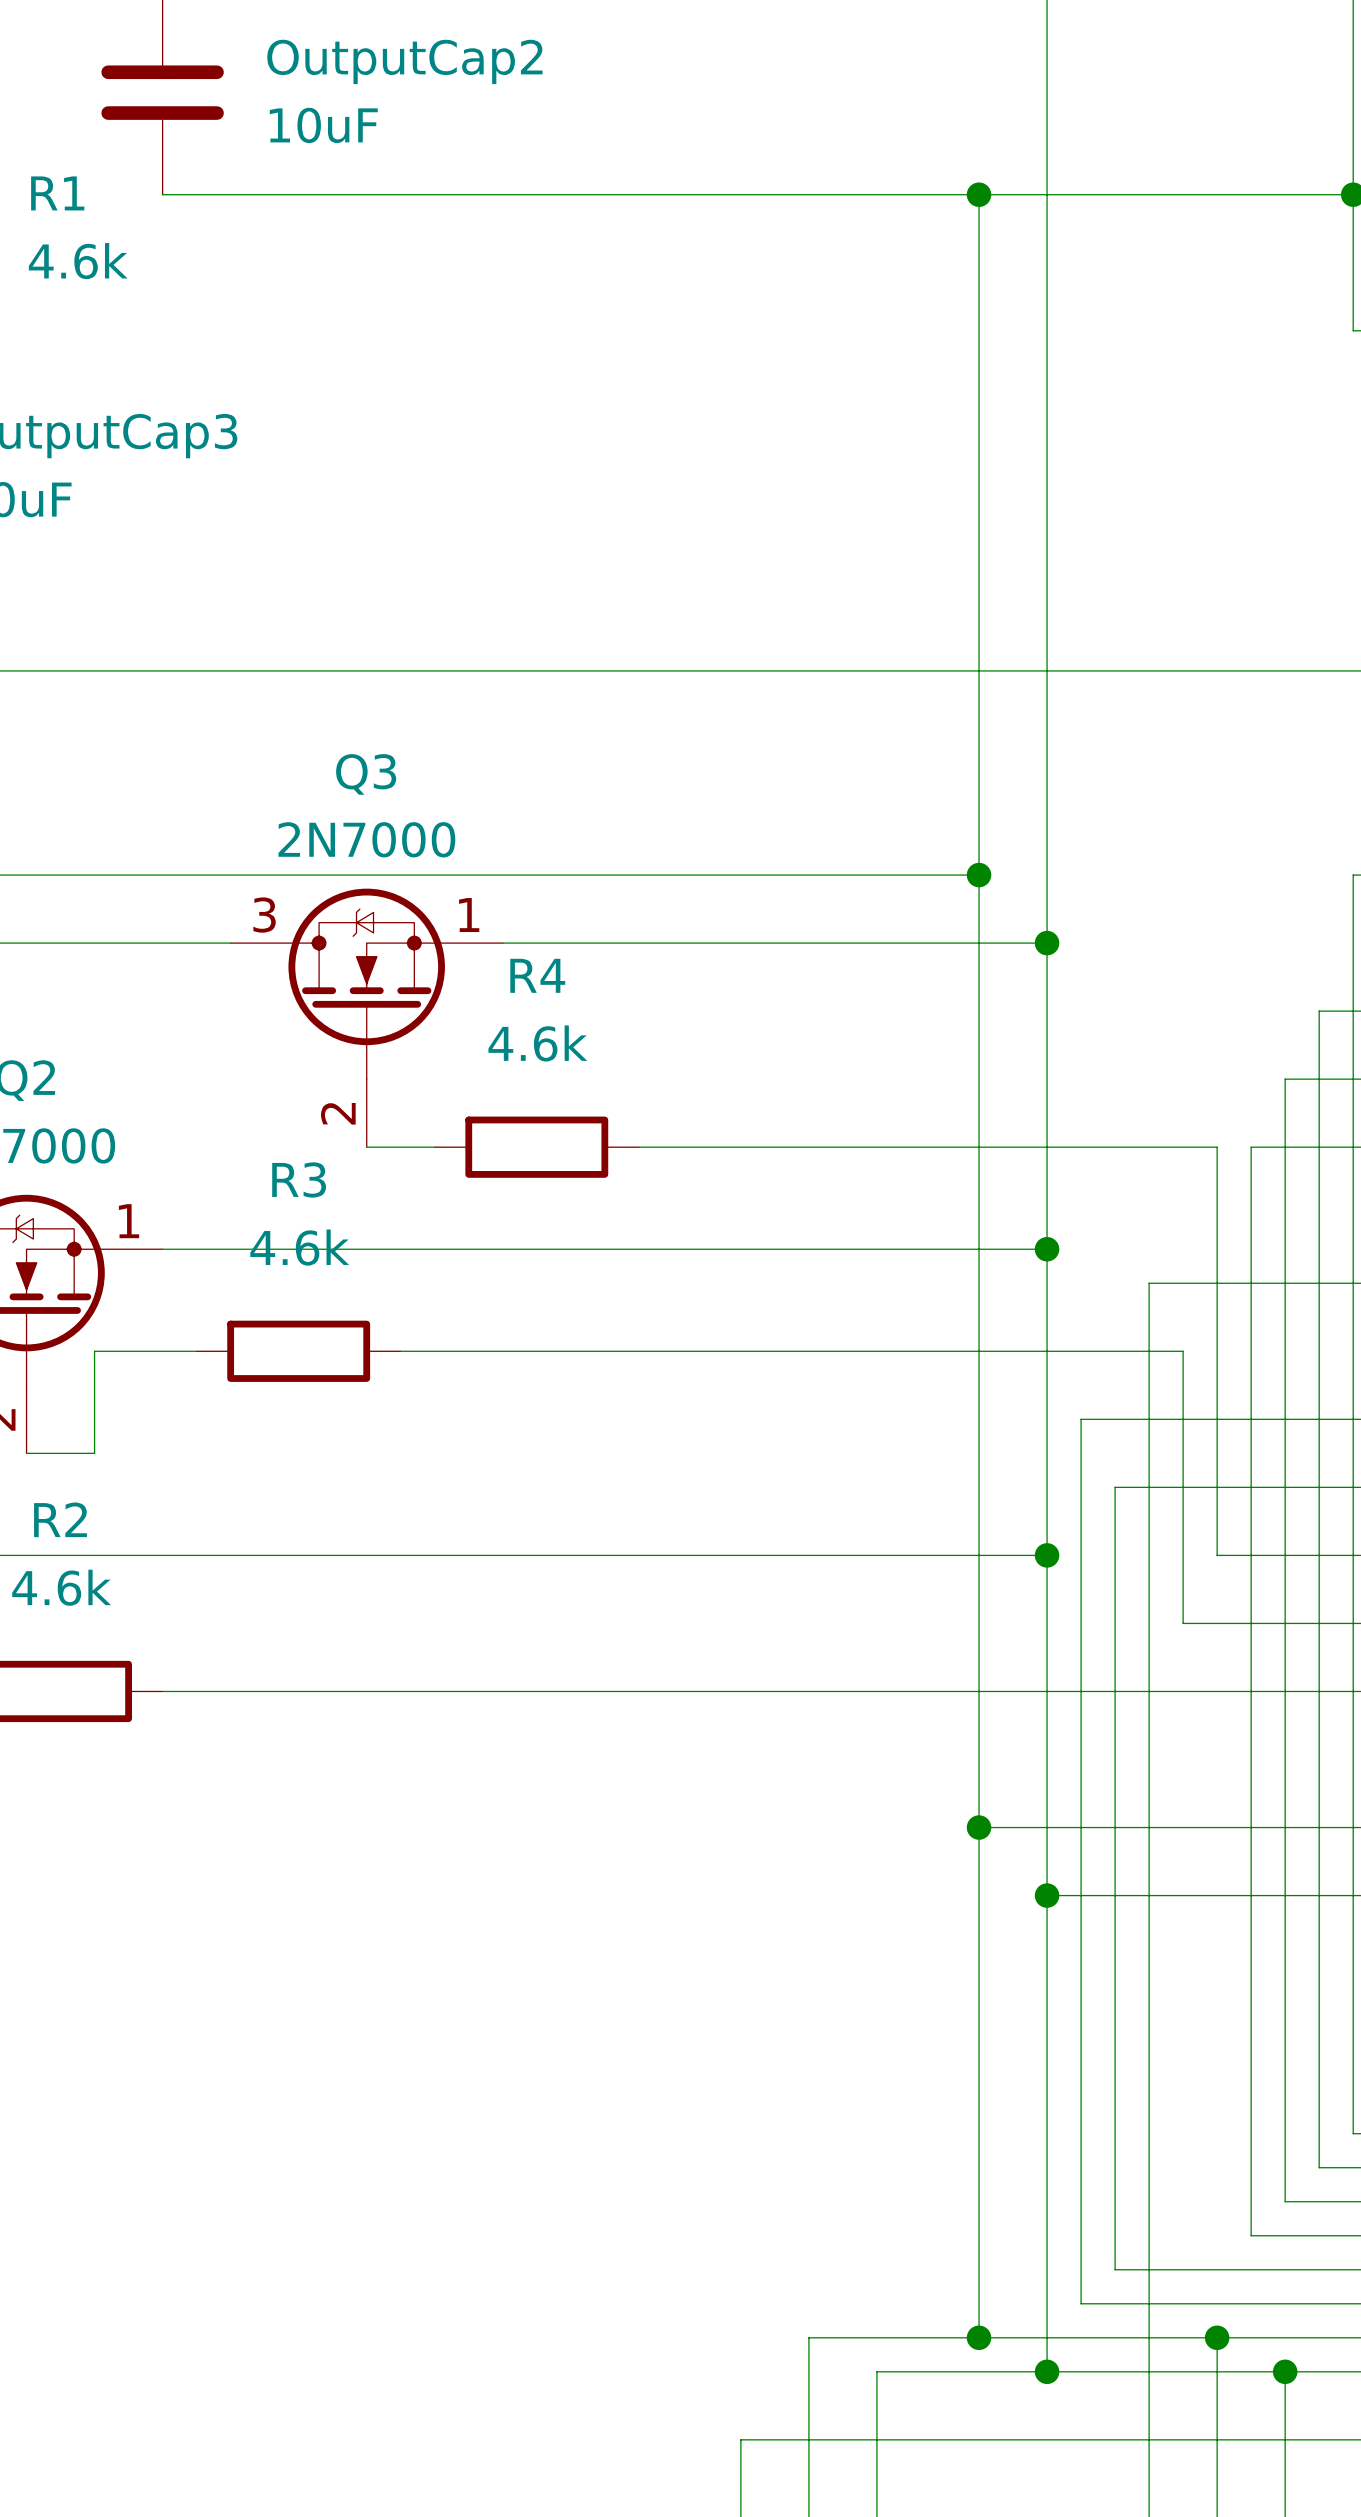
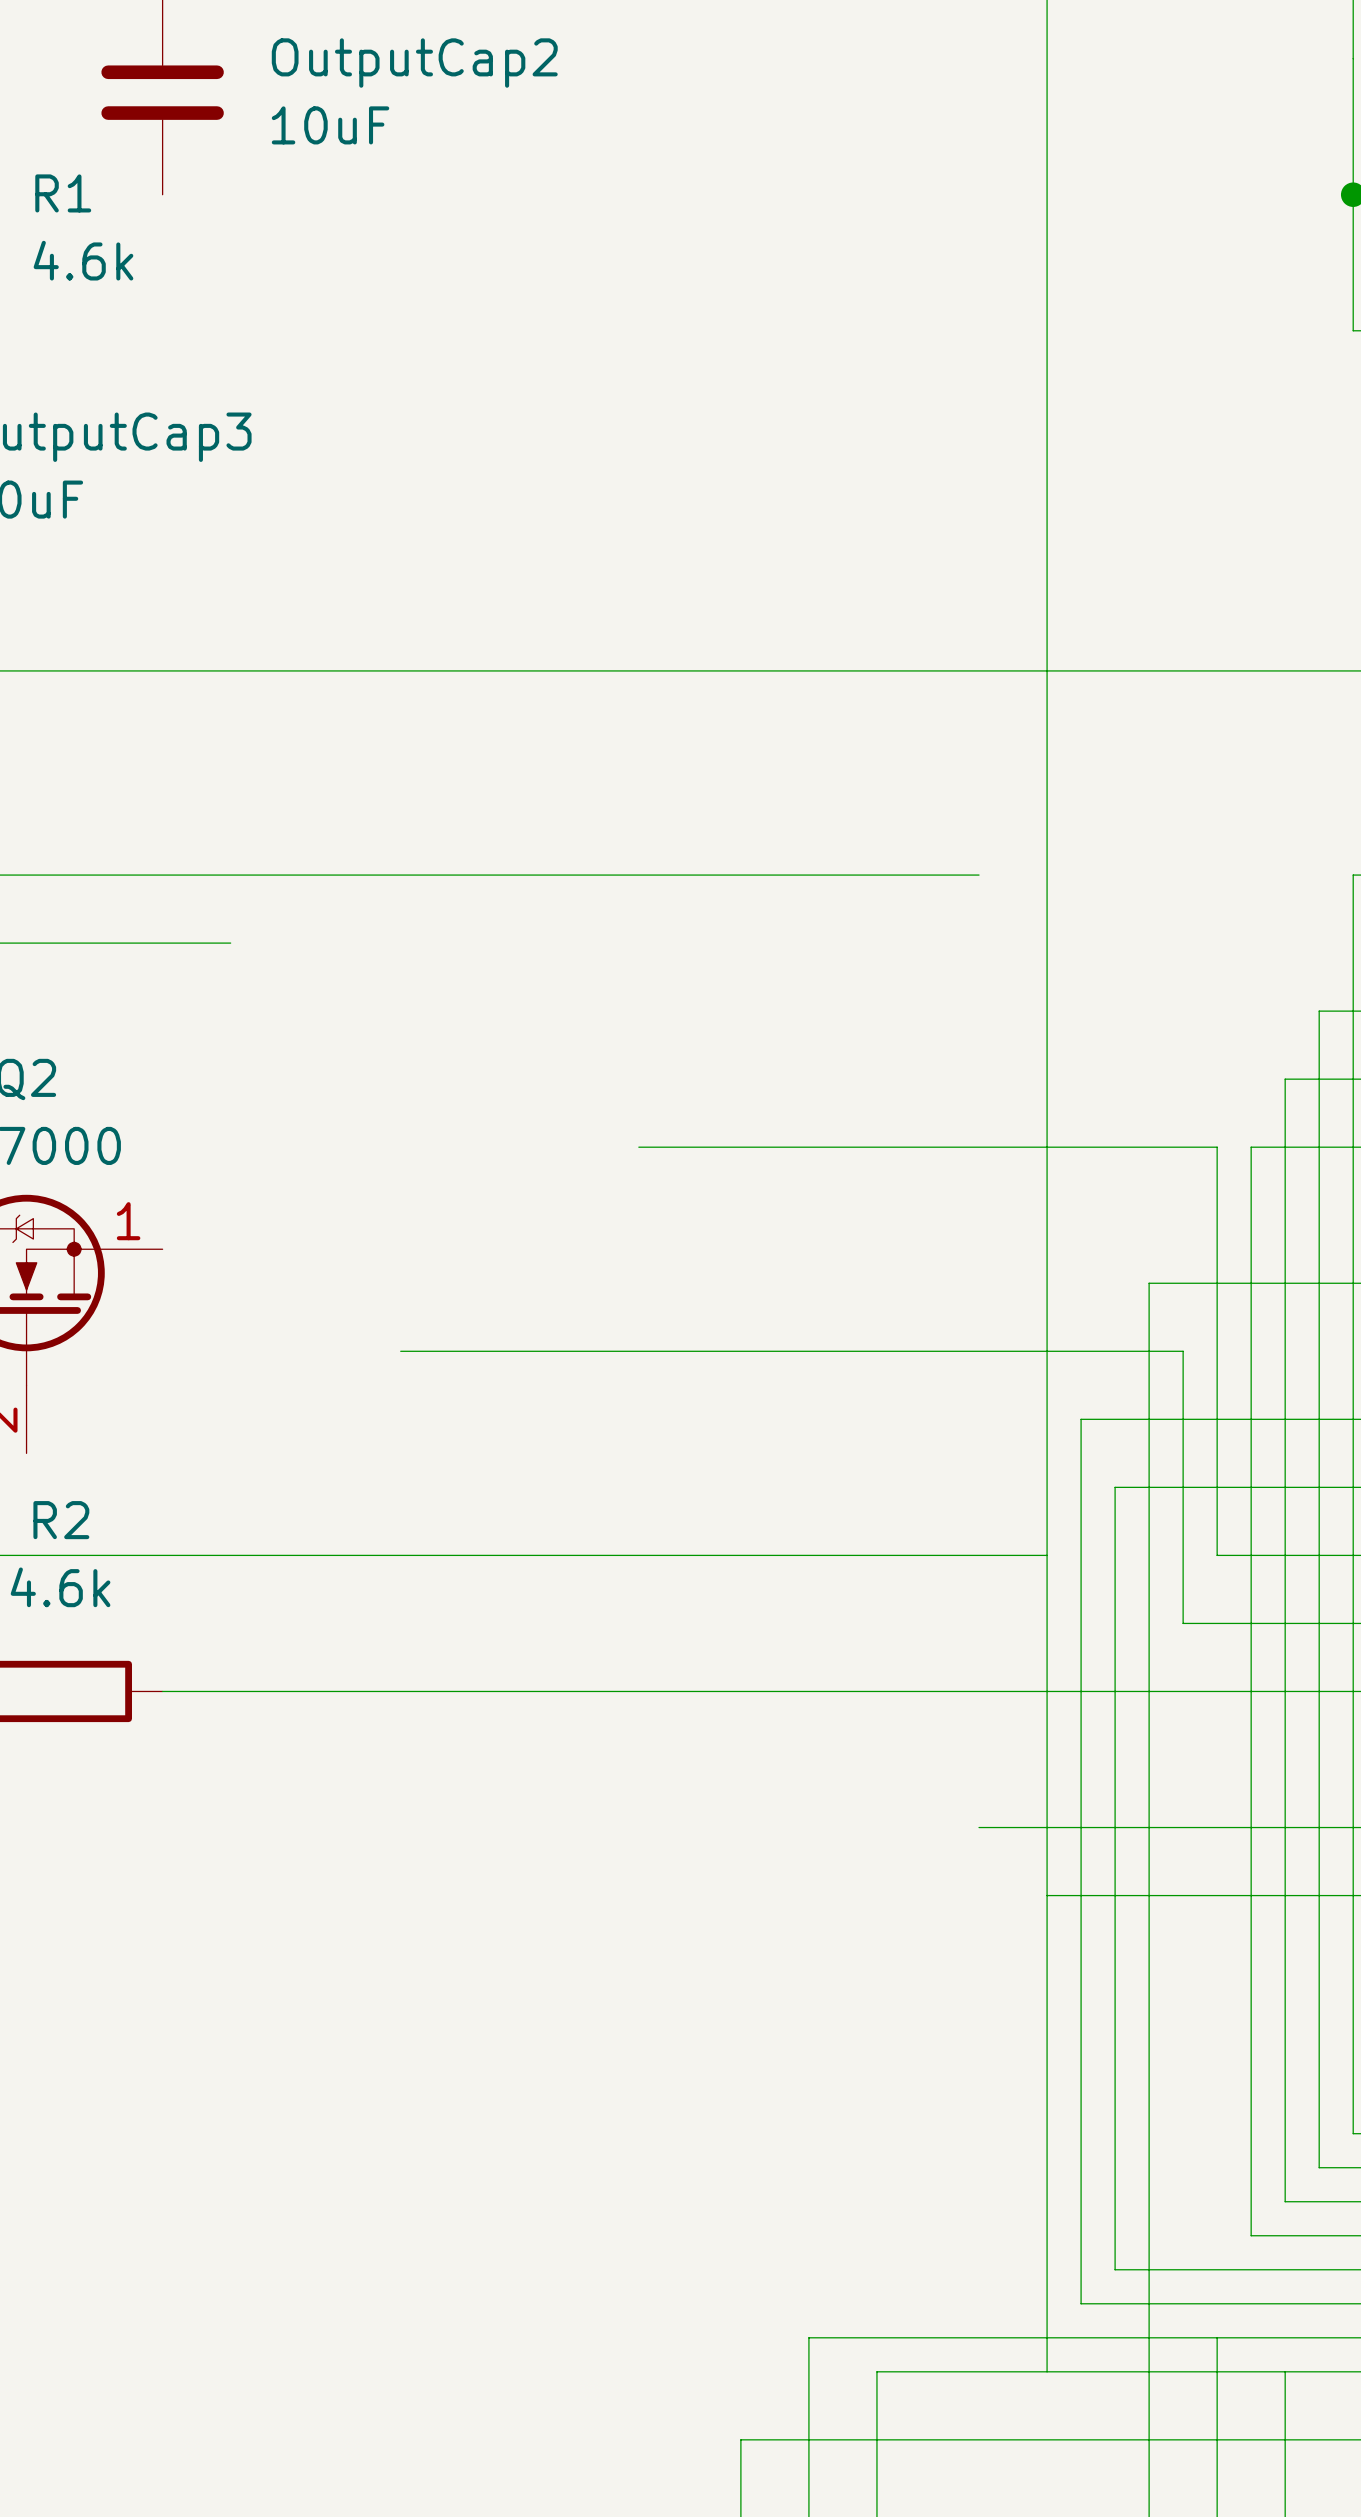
wire: (162, 194) (1353, 194) -> none
wire: (979, 194) (979, 2337) -> none
junction: (979, 194) -> none
junction: (979, 875) -> none
wire: (502, 943) (1047, 943) -> none
junction: (1047, 943) -> none
Q3: 2N7000 (366, 1017) -> none
wire: (366, 1147) (434, 1147) -> none
R4: 4.6k (536, 1147) -> none
wire: (162, 1249) (1047, 1249) -> none
junction: (1047, 1249) -> none
wire: (196, 1351) (94, 1351) (94, 1453) (26, 1453) -> none
R3: 4.6k (298, 1351) -> none
junction: (1047, 1555) -> none
junction: (979, 1827) -> none
junction: (1047, 1895) -> none
junction: (979, 2337) -> none
junction: (1217, 2337) -> none
junction: (1047, 2371) -> none
junction: (1285, 2371) -> none

